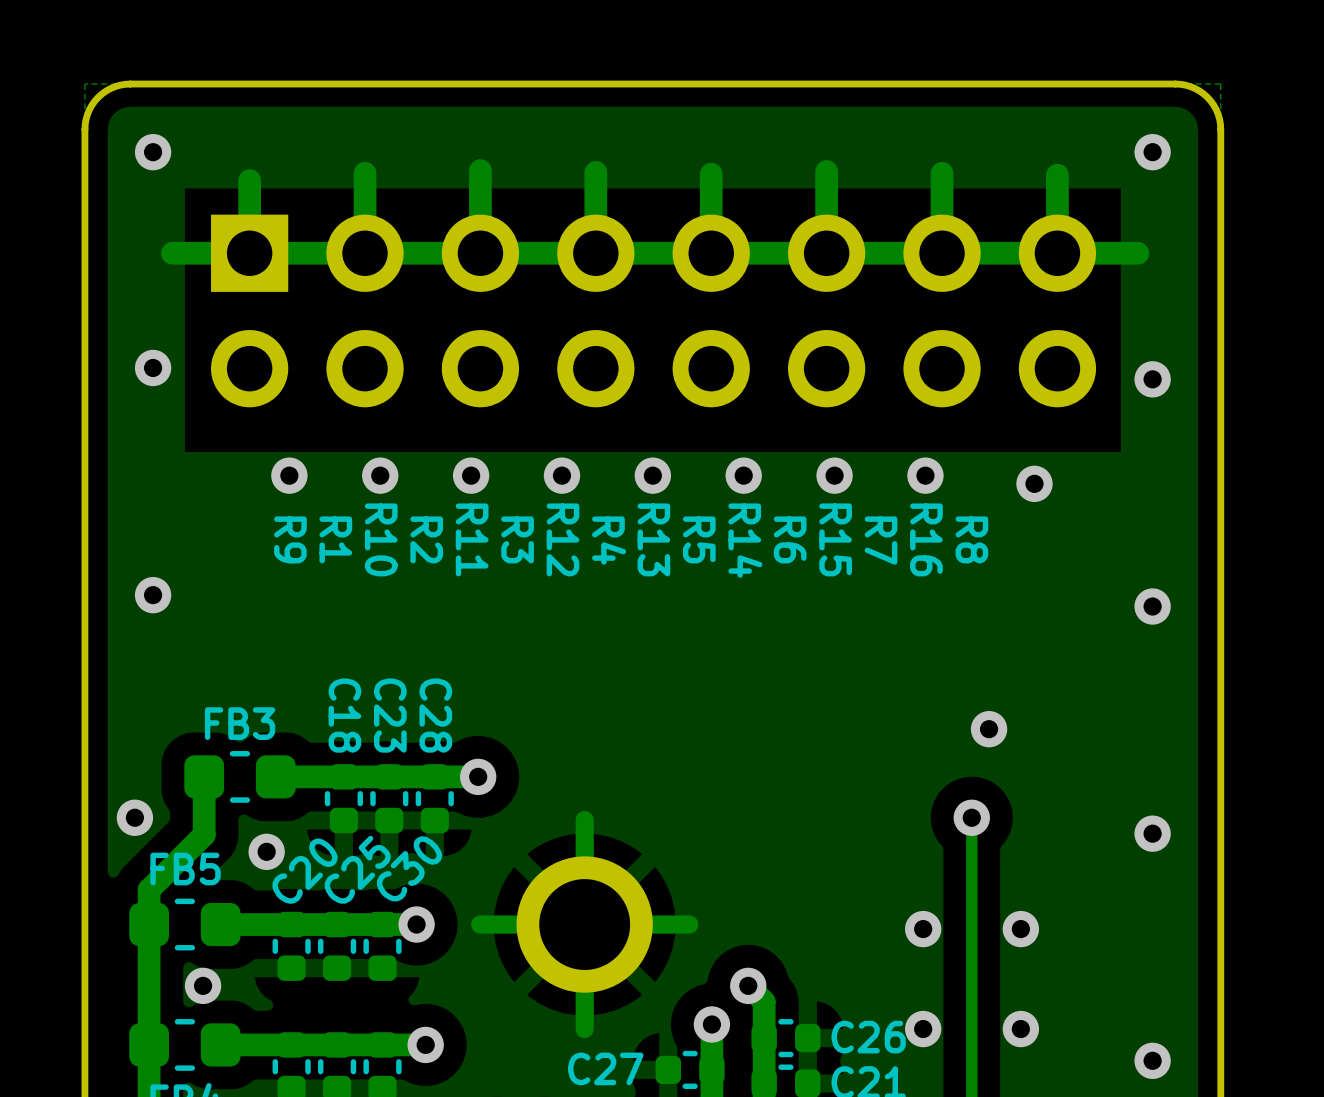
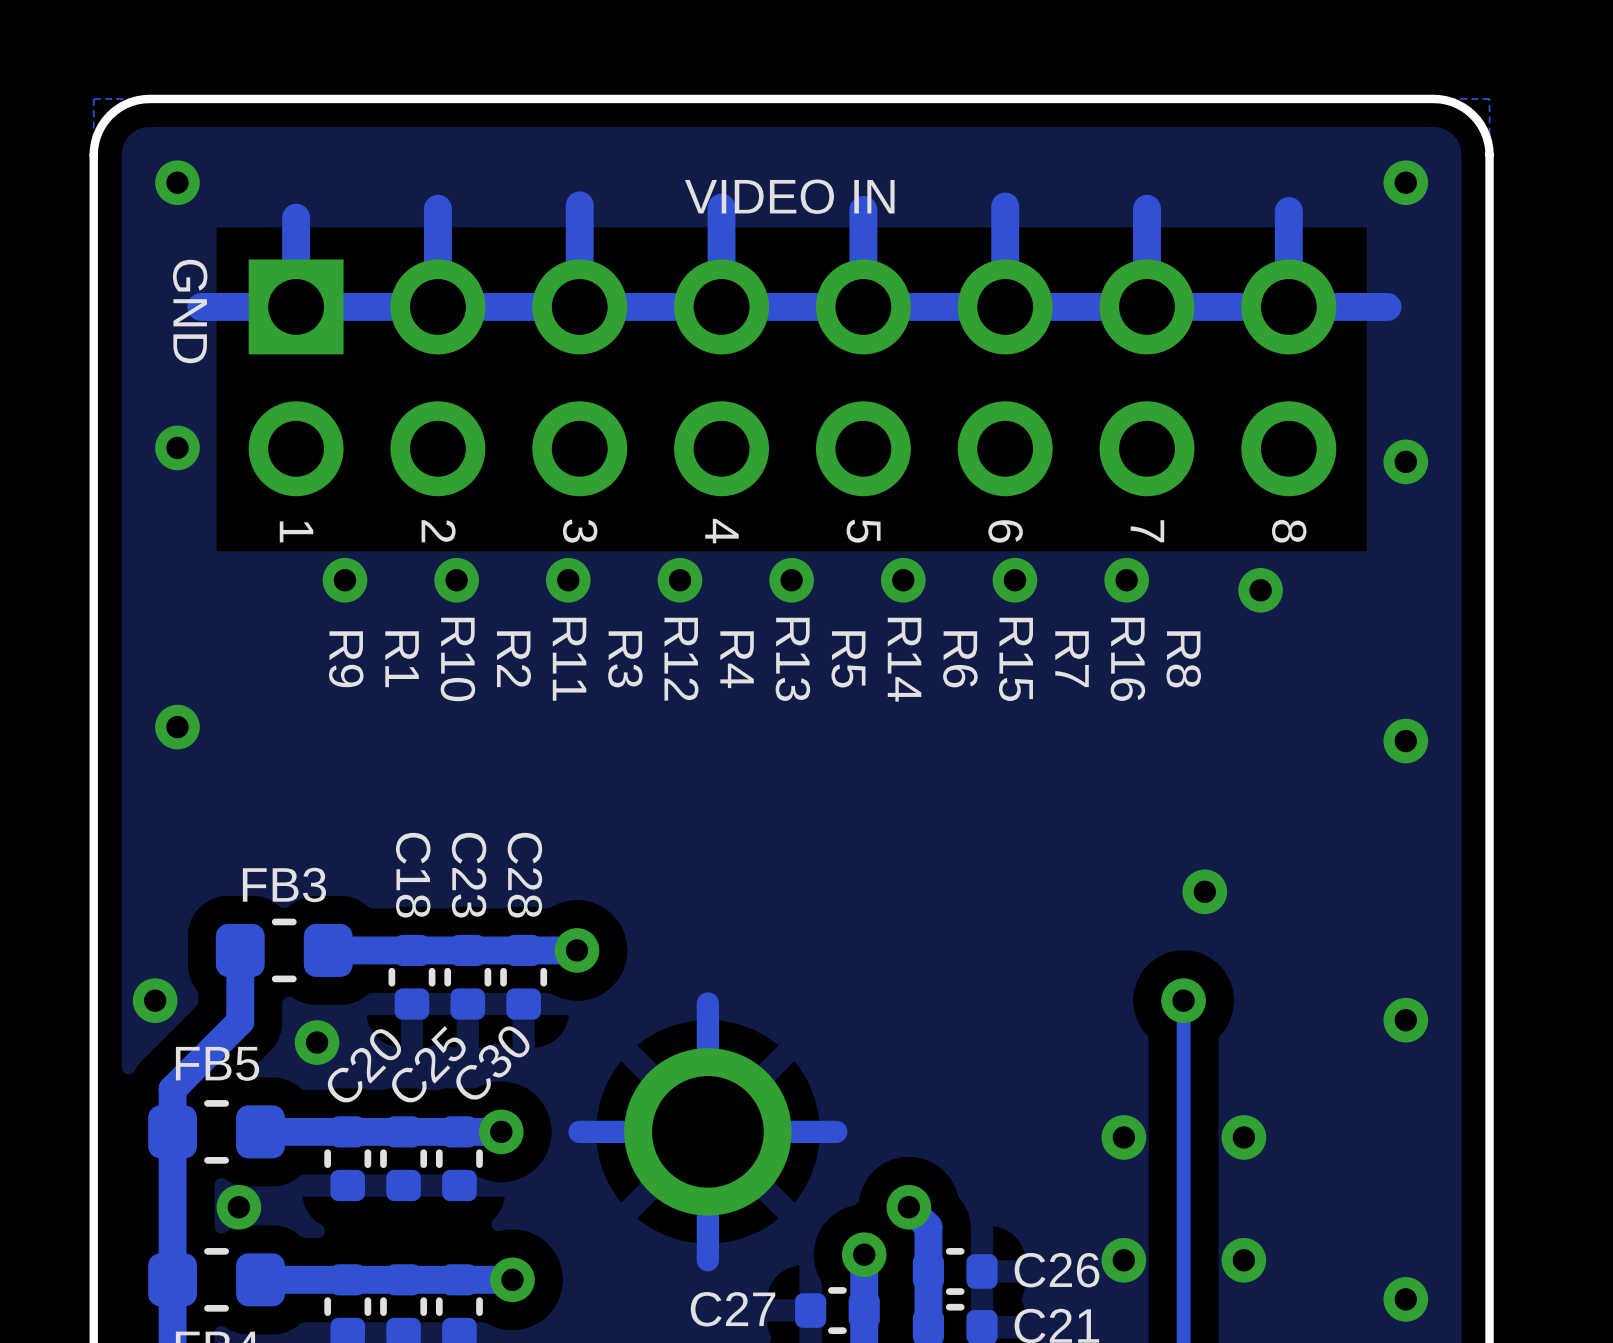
text: none -> VIDEO IN (789, 196)
text: none -> GND (190, 311)
text: none -> 1 (296, 531)
text: none -> 2 (438, 531)
text: none -> 3 (580, 531)
text: none -> 5 (863, 531)
text: none -> 6 (1005, 531)
text: none -> 7 (1147, 531)
text: none -> 8 (1289, 531)
text: none -> 4 (721, 531)

